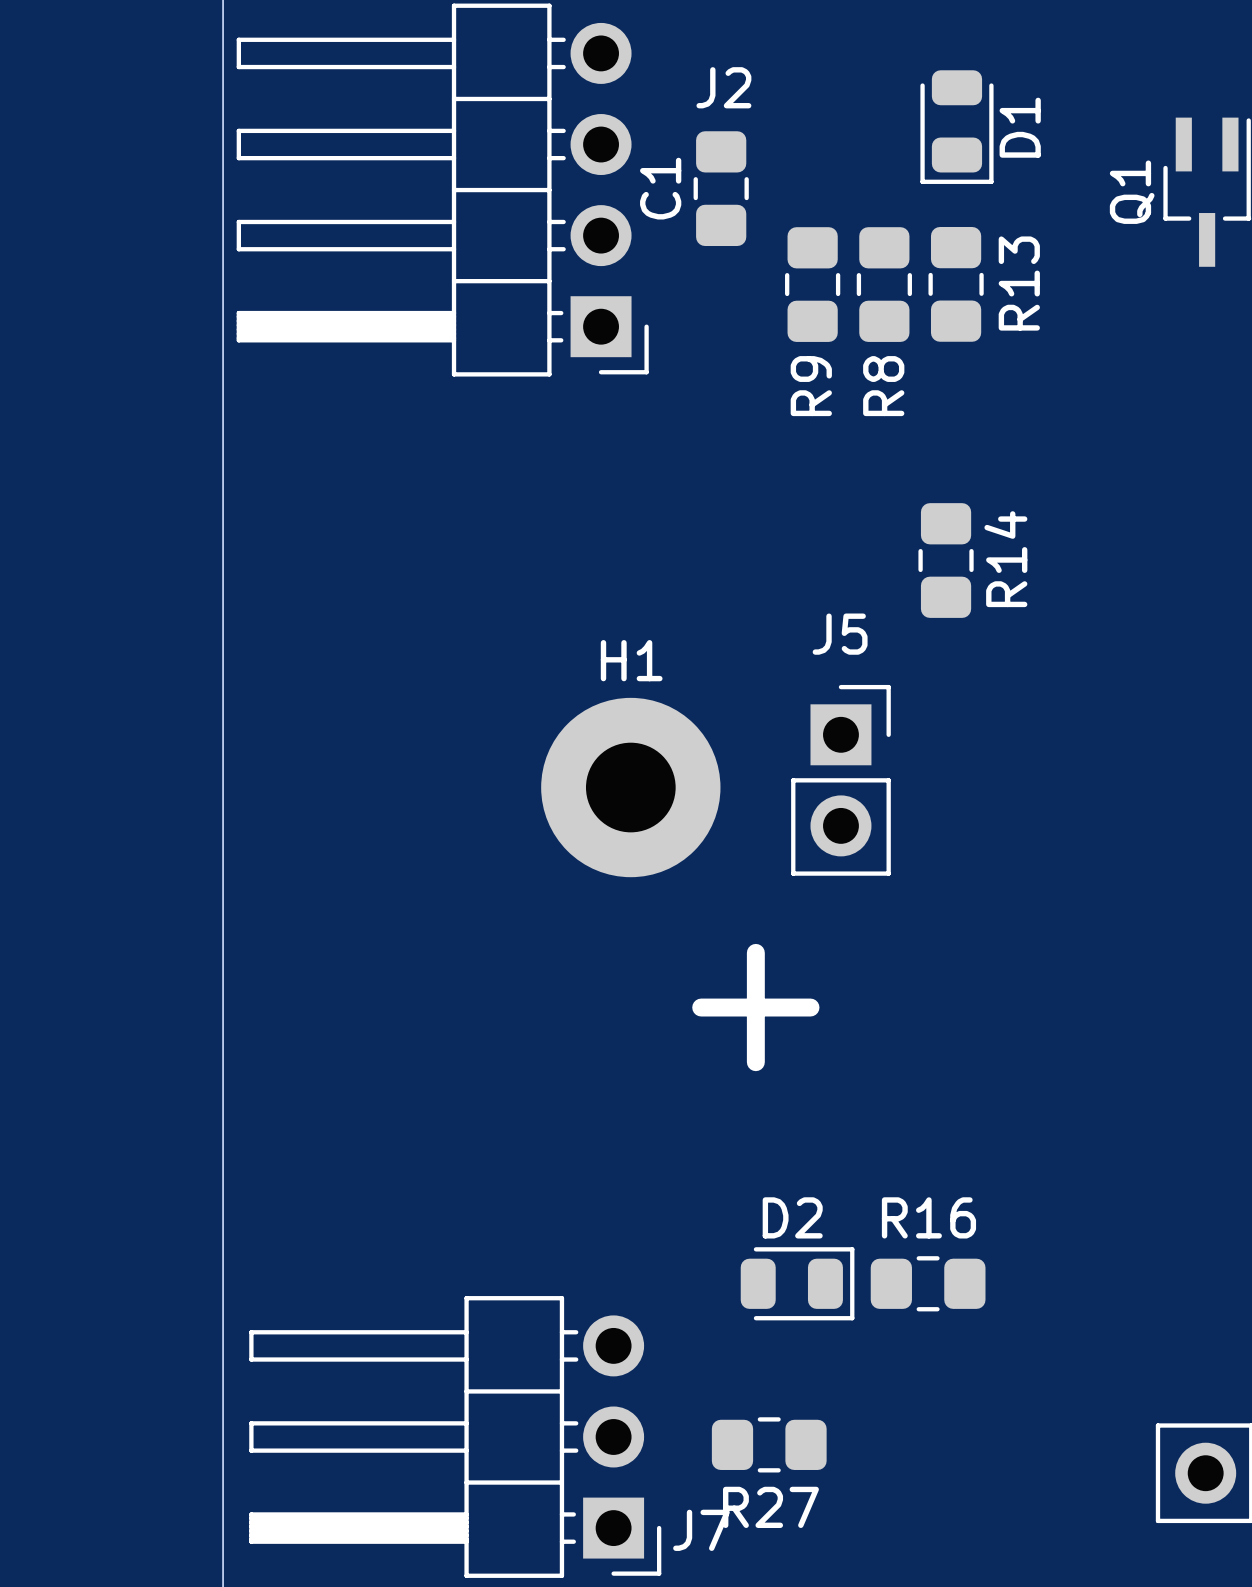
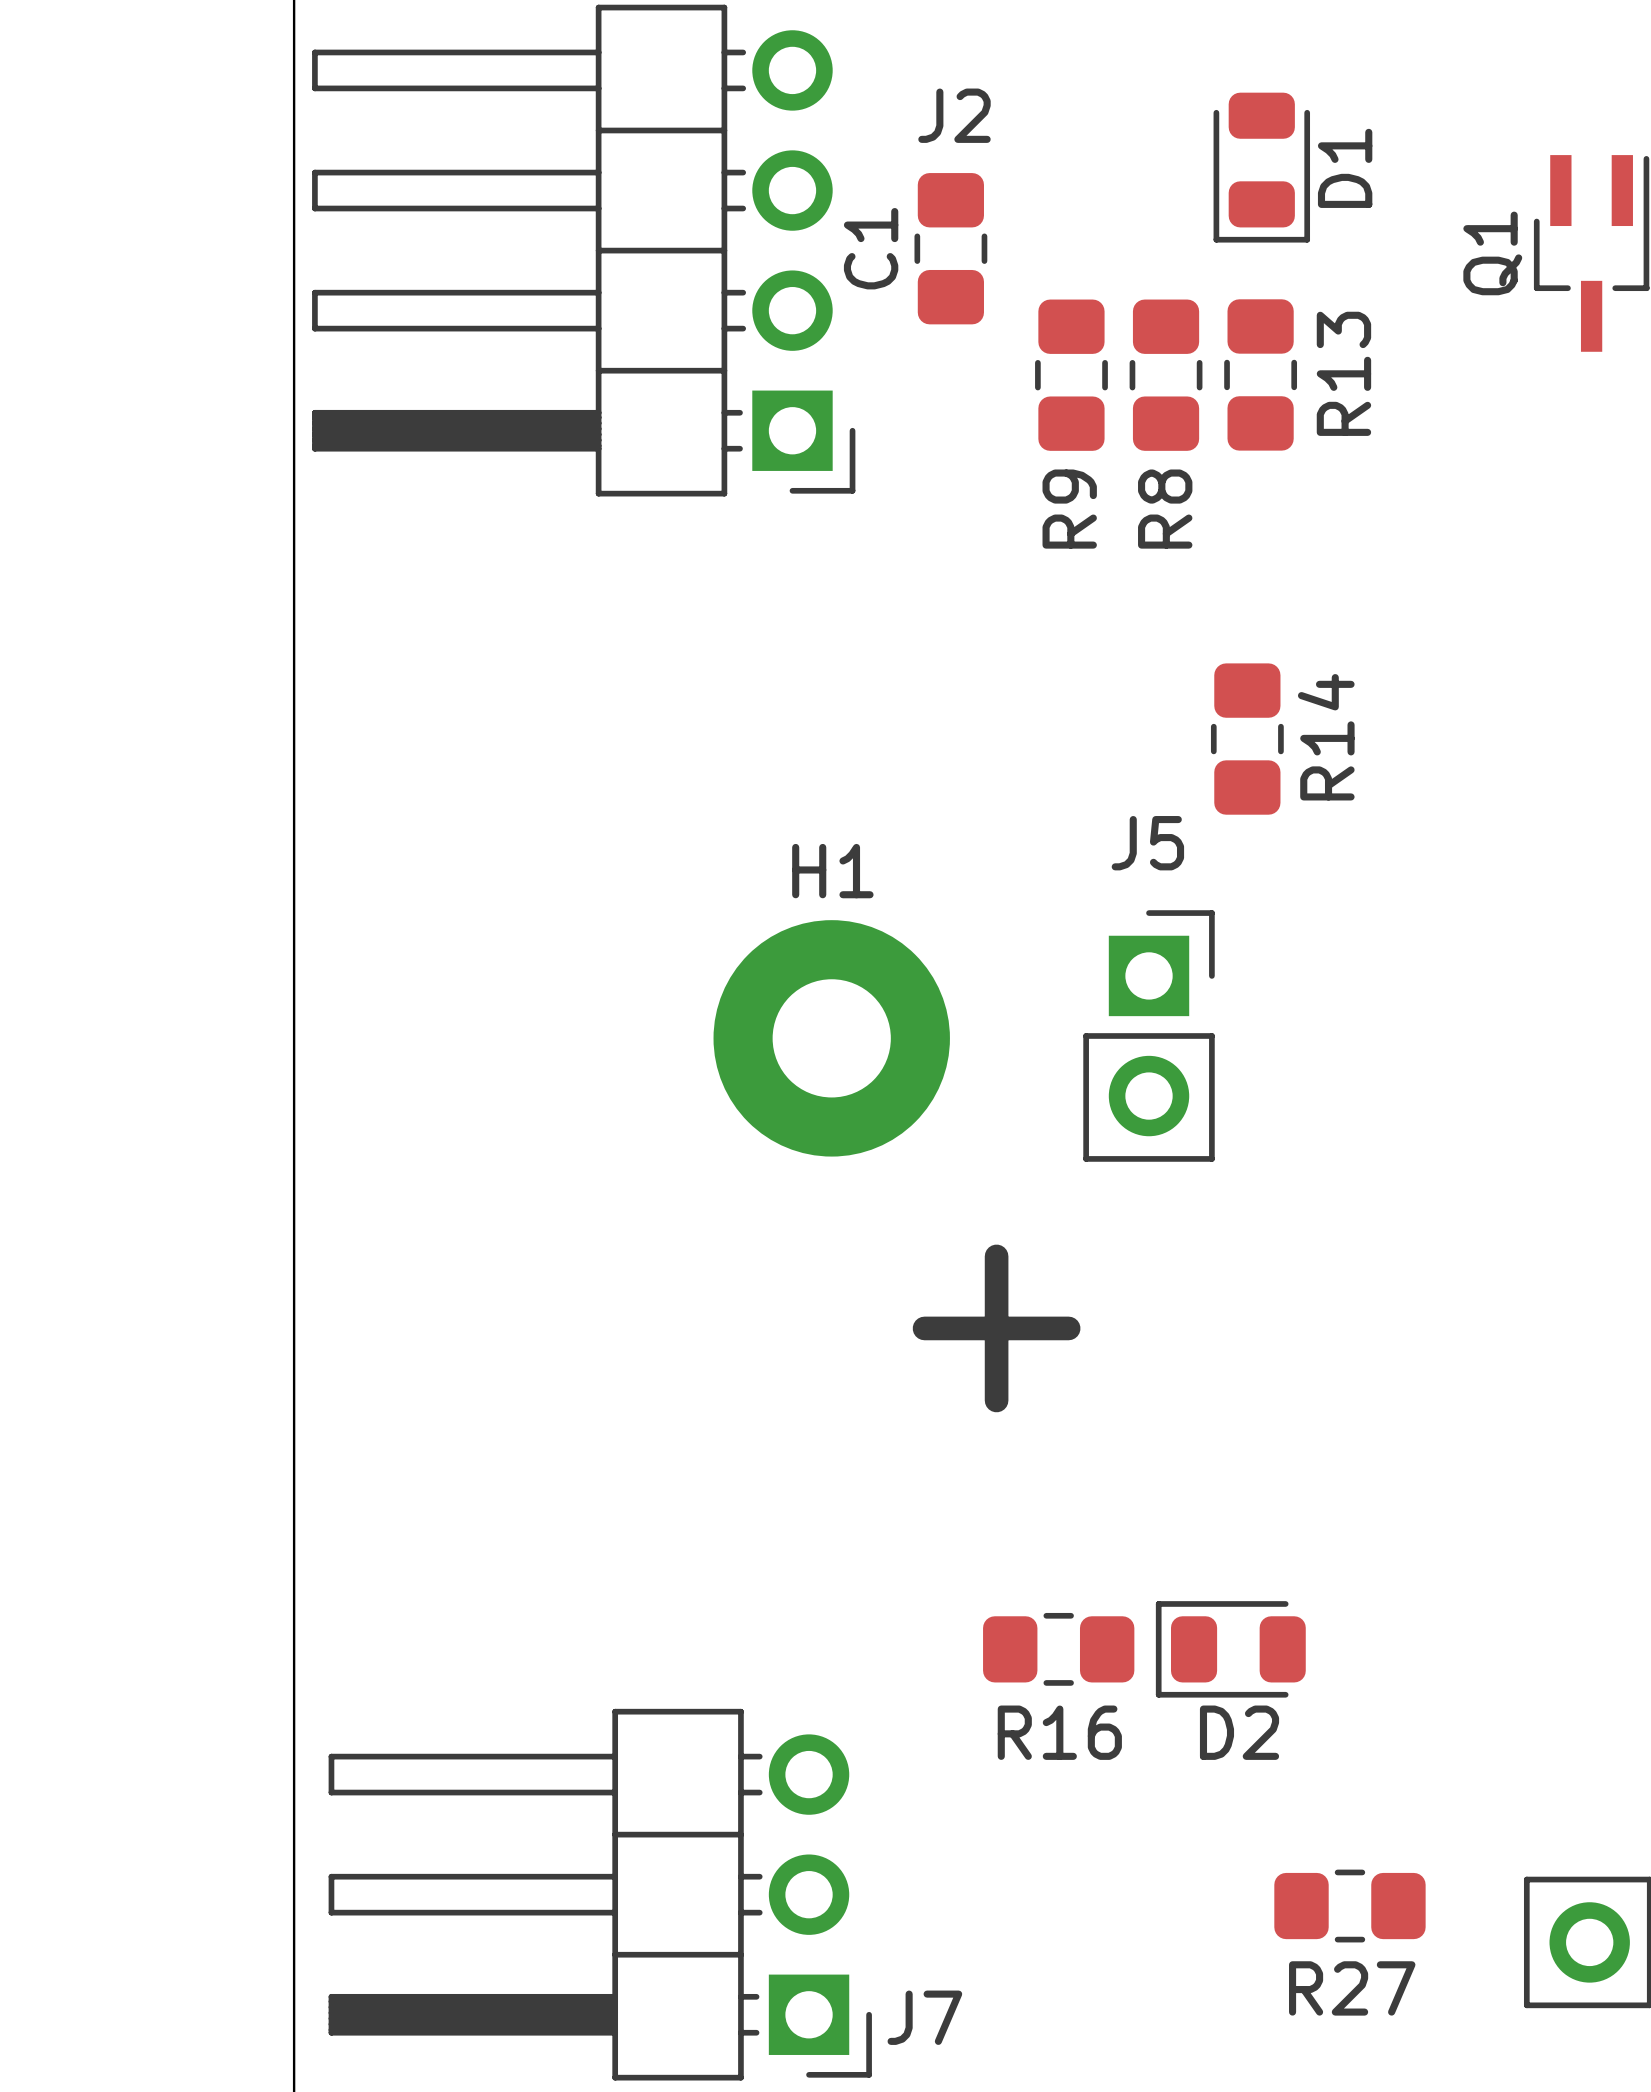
J5 position: (840, 780) -> (1149, 1035)
R16 name position: R16 (928, 1217) -> R16 (1059, 1732)
D2 rotation: 0° (797, 1283) -> 180° (1230, 1649)
D2 position: (797, 1283) -> (1230, 1649)
R16 position: (928, 1283) -> (1058, 1649)
R27 position: (769, 1444) -> (1349, 1906)

